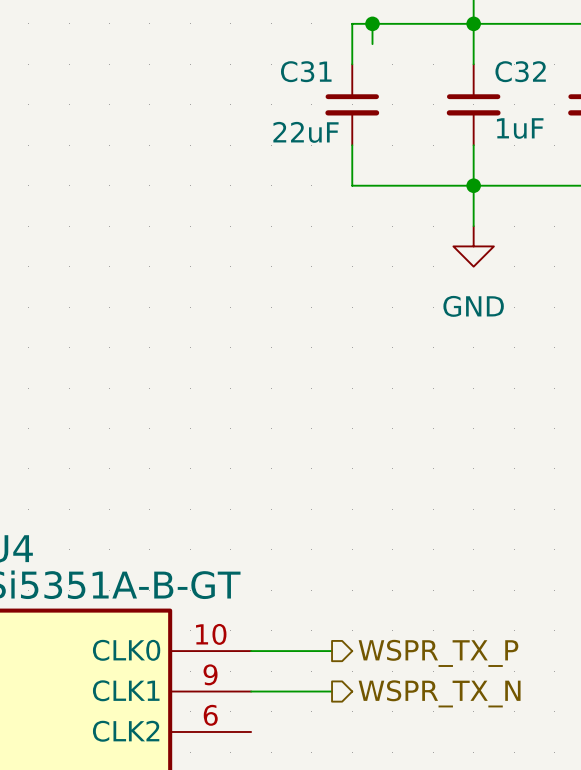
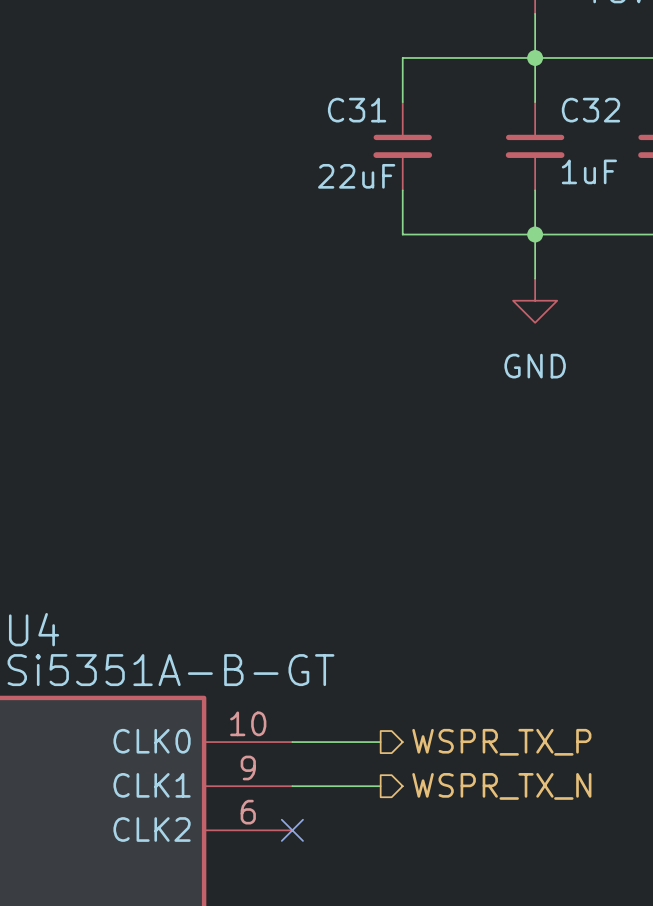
wire: (372, 23) (372, 44) -> none
junction: (372, 23) -> none
no-connect mark: none -> (292, 830)

